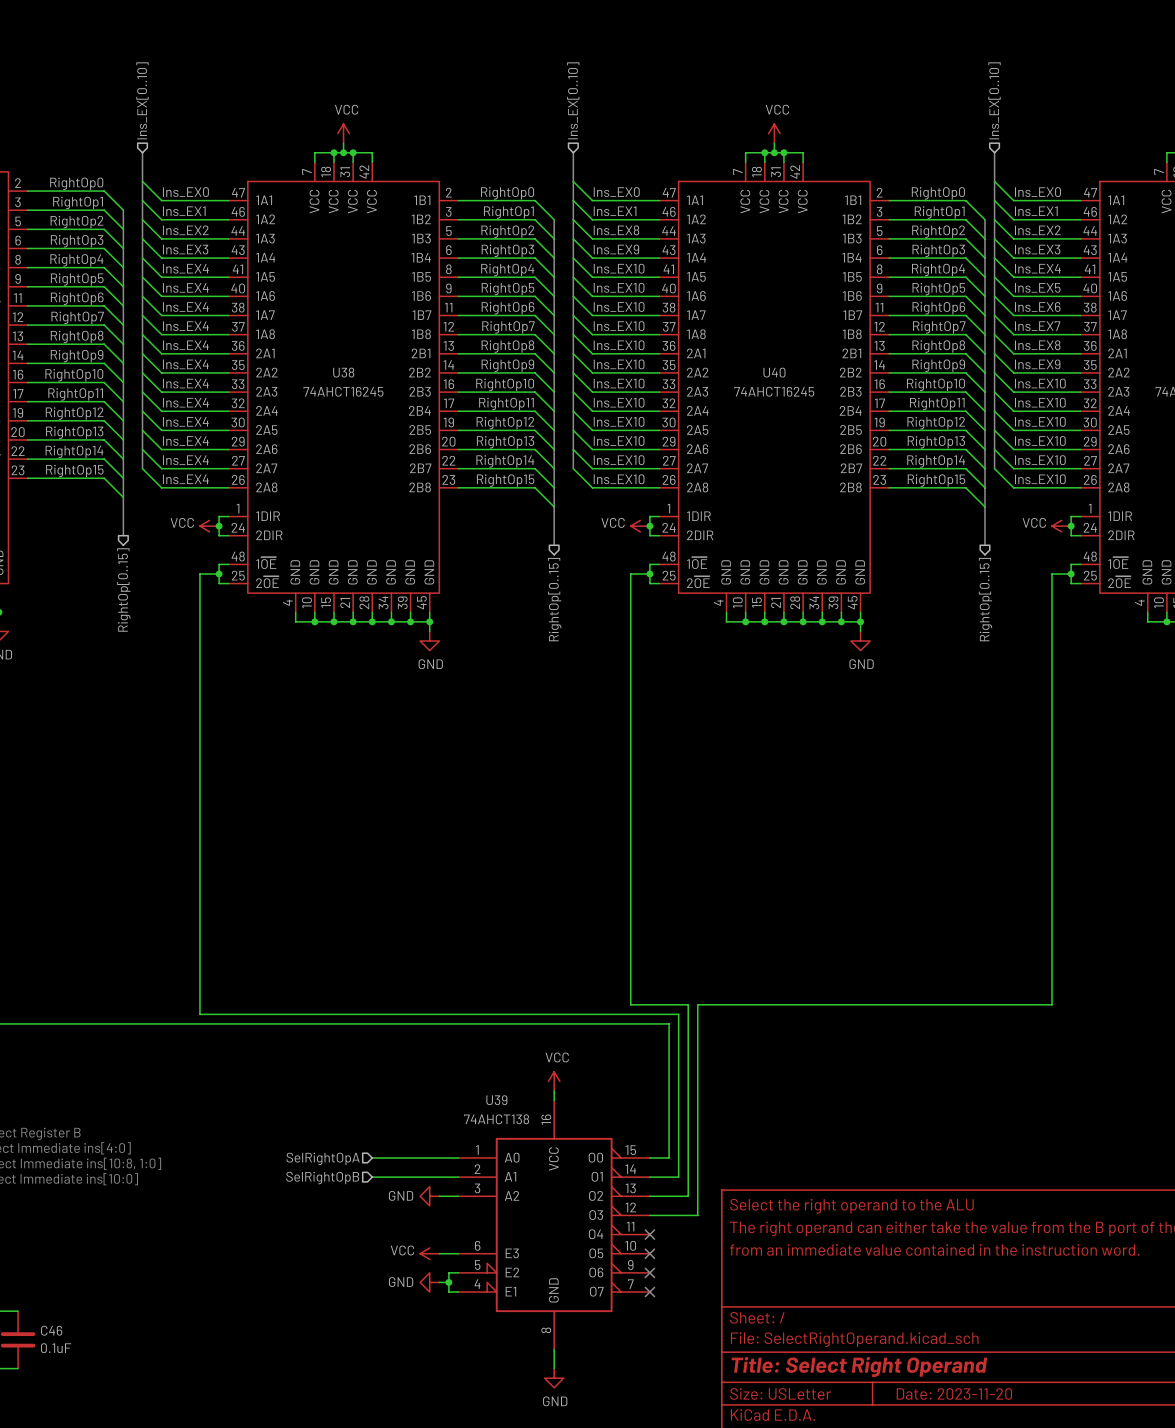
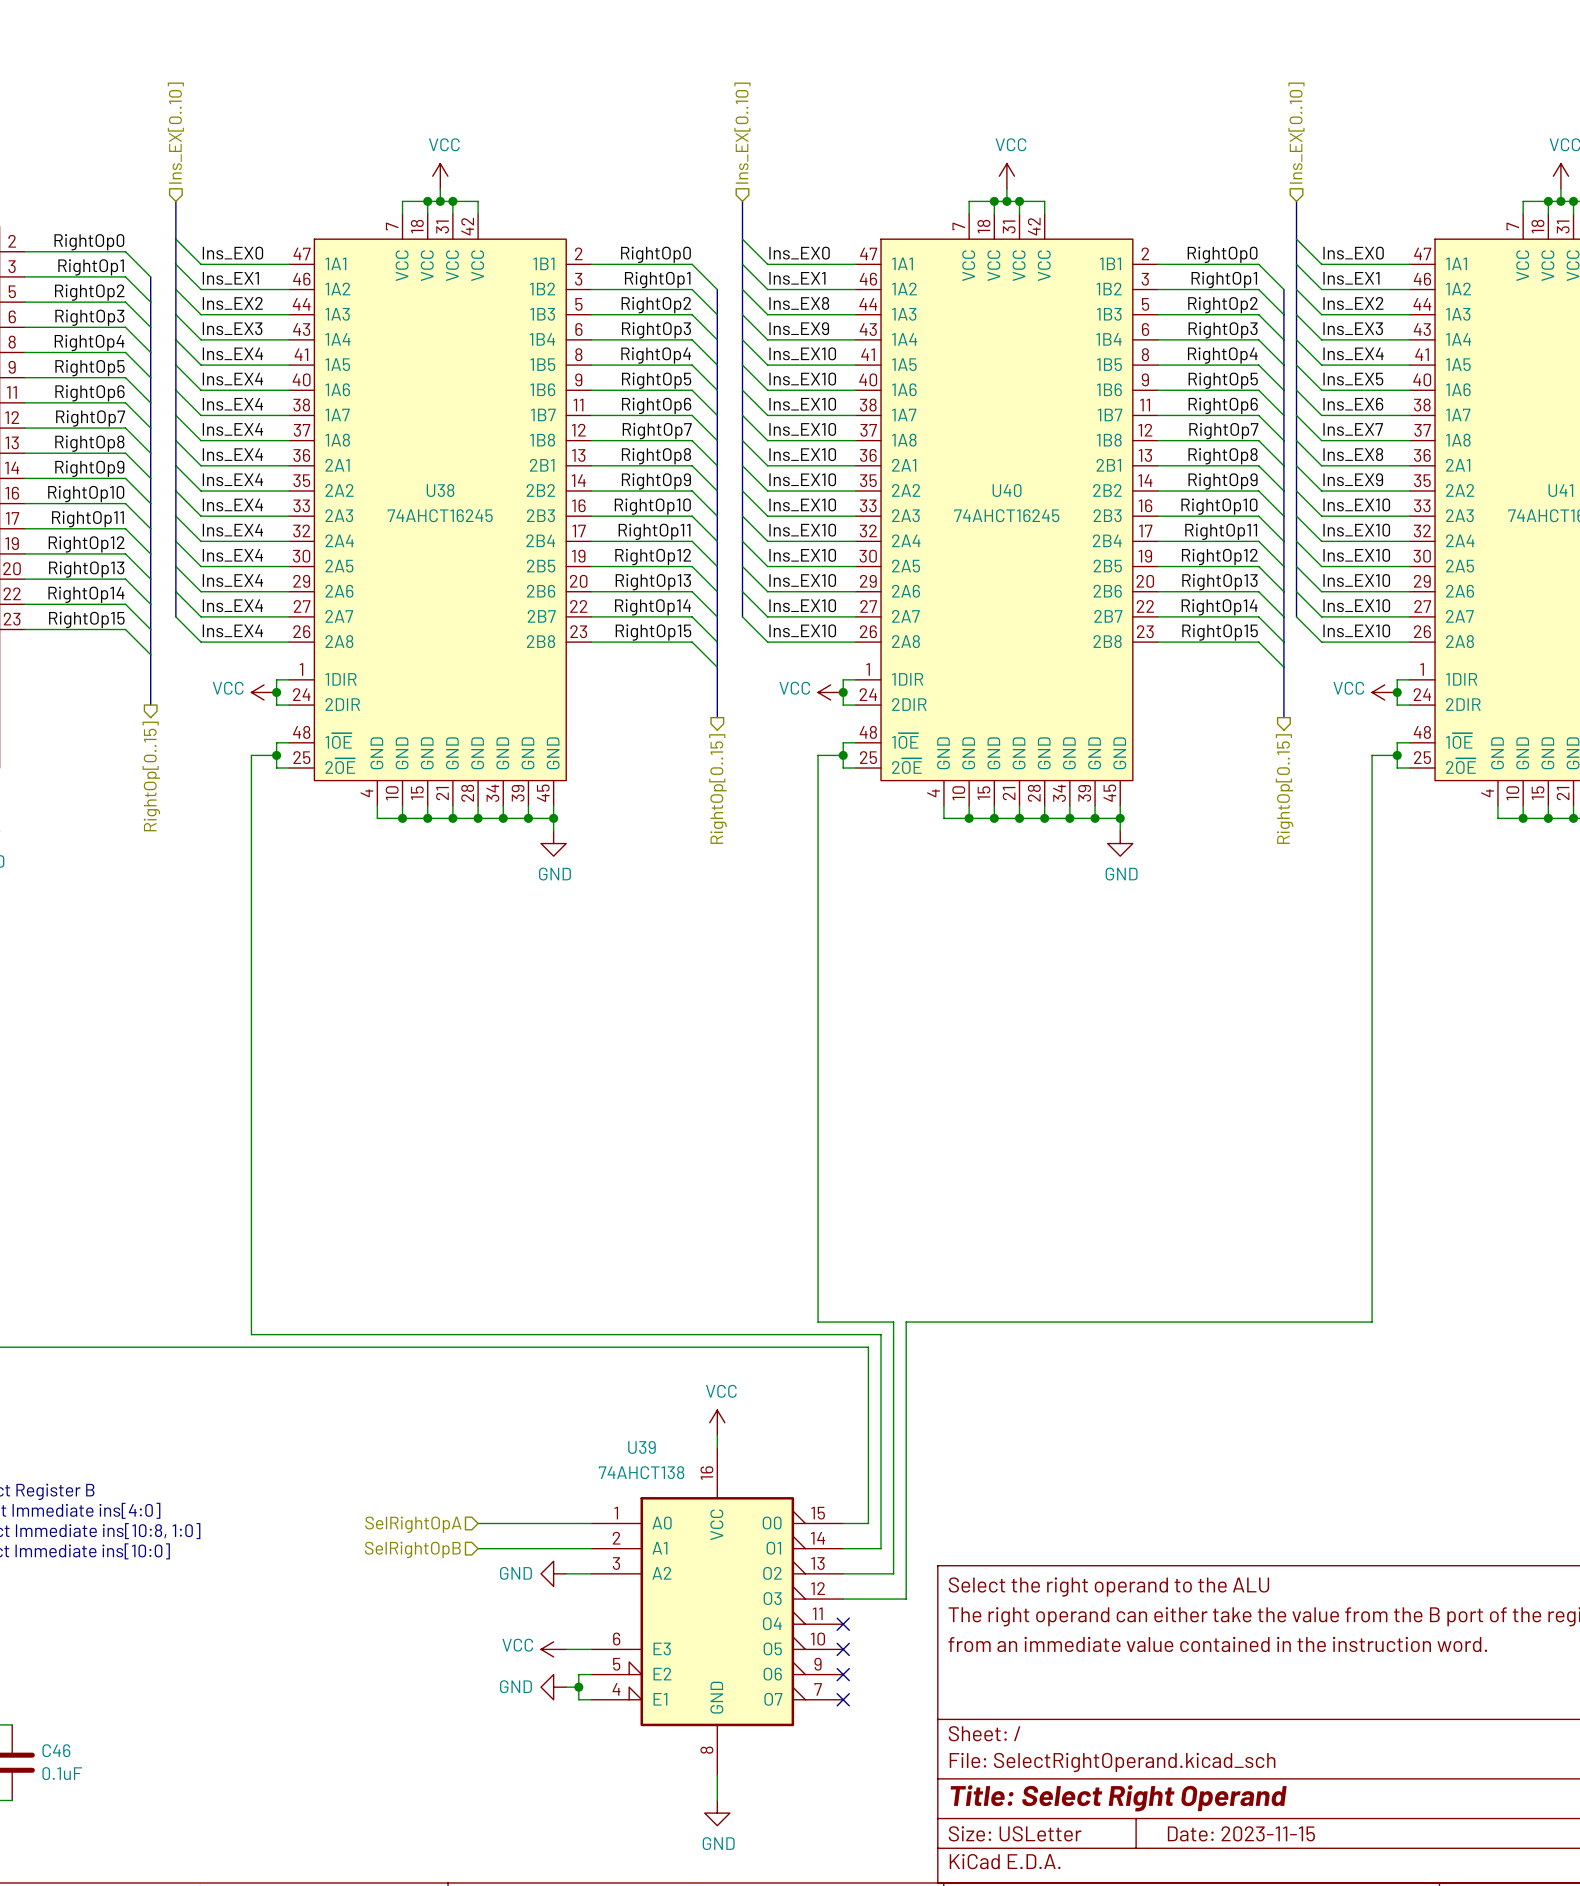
title block: Date: 2023-11-20 (954, 1393) -> Date: 2023-11-15 (1241, 1833)

